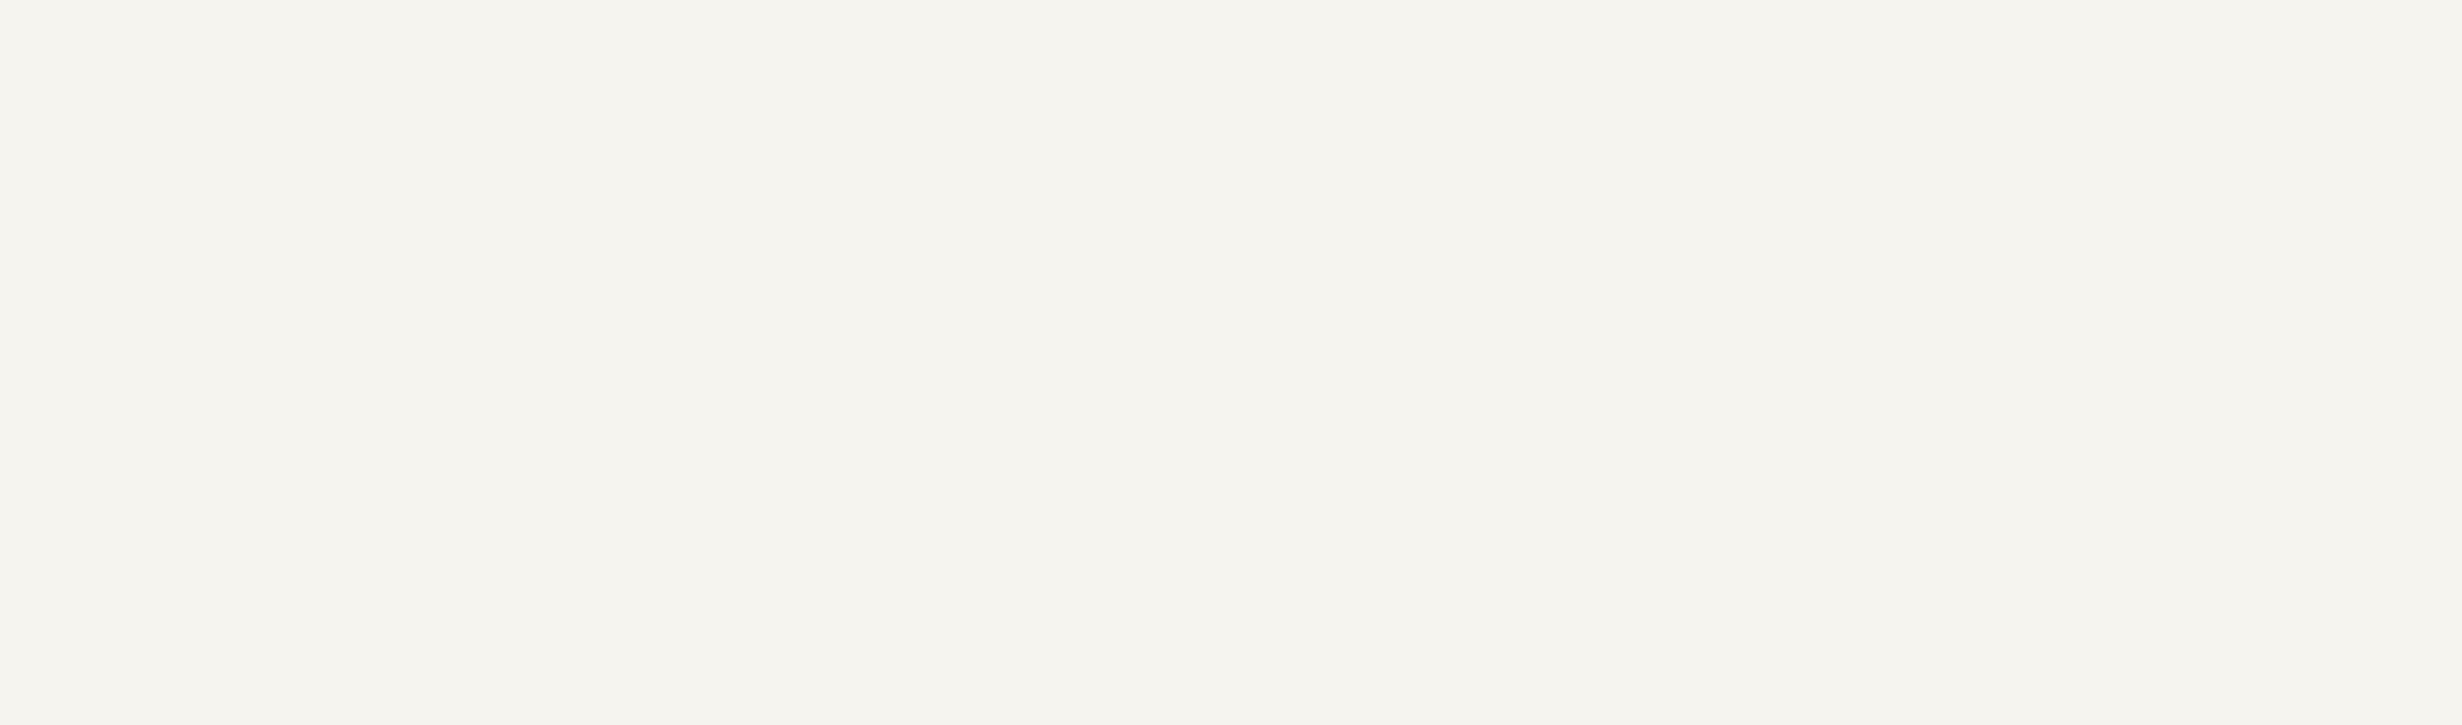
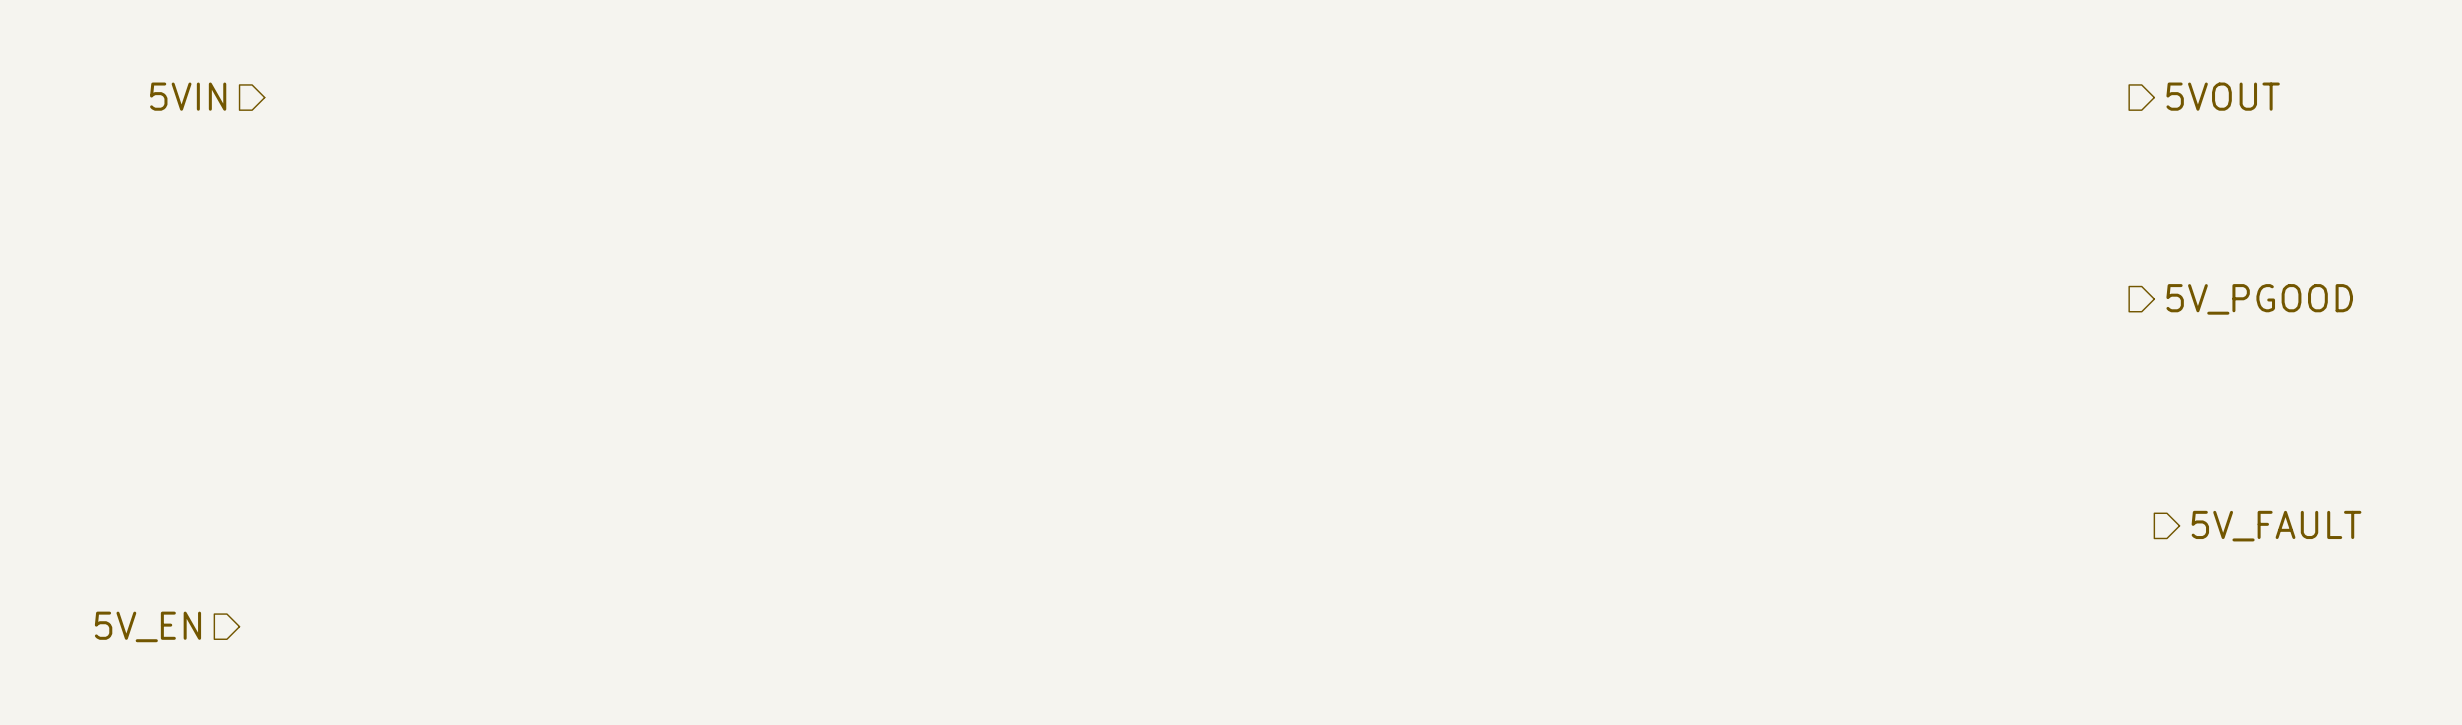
hierarchical label: none -> 5VIN (188, 96)
hierarchical label: none -> 5VOUT (2223, 96)
hierarchical label: none -> 5V_PGOOD (2259, 299)
hierarchical label: none -> 5V_FAULT (2276, 526)
hierarchical label: none -> 5V_EN (147, 626)

